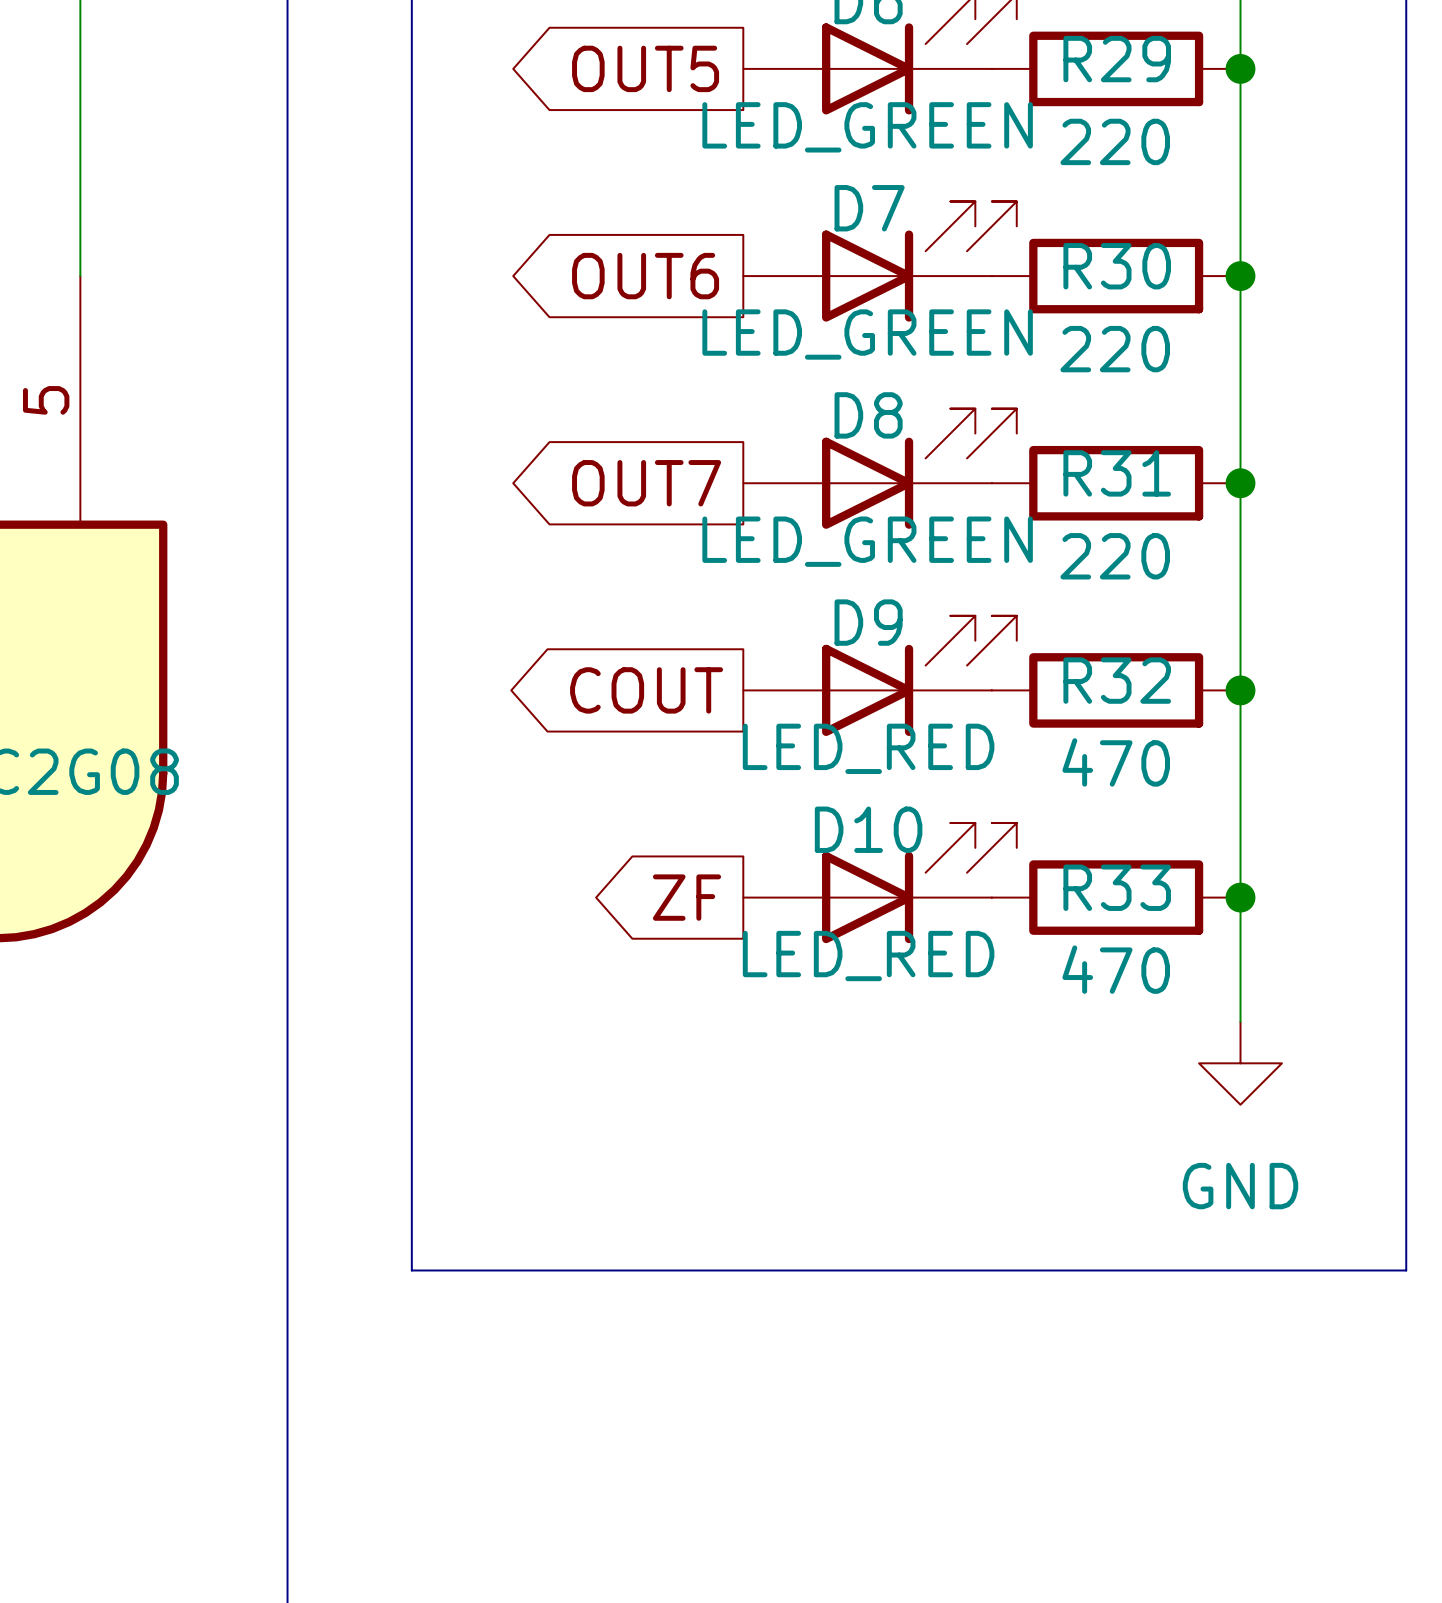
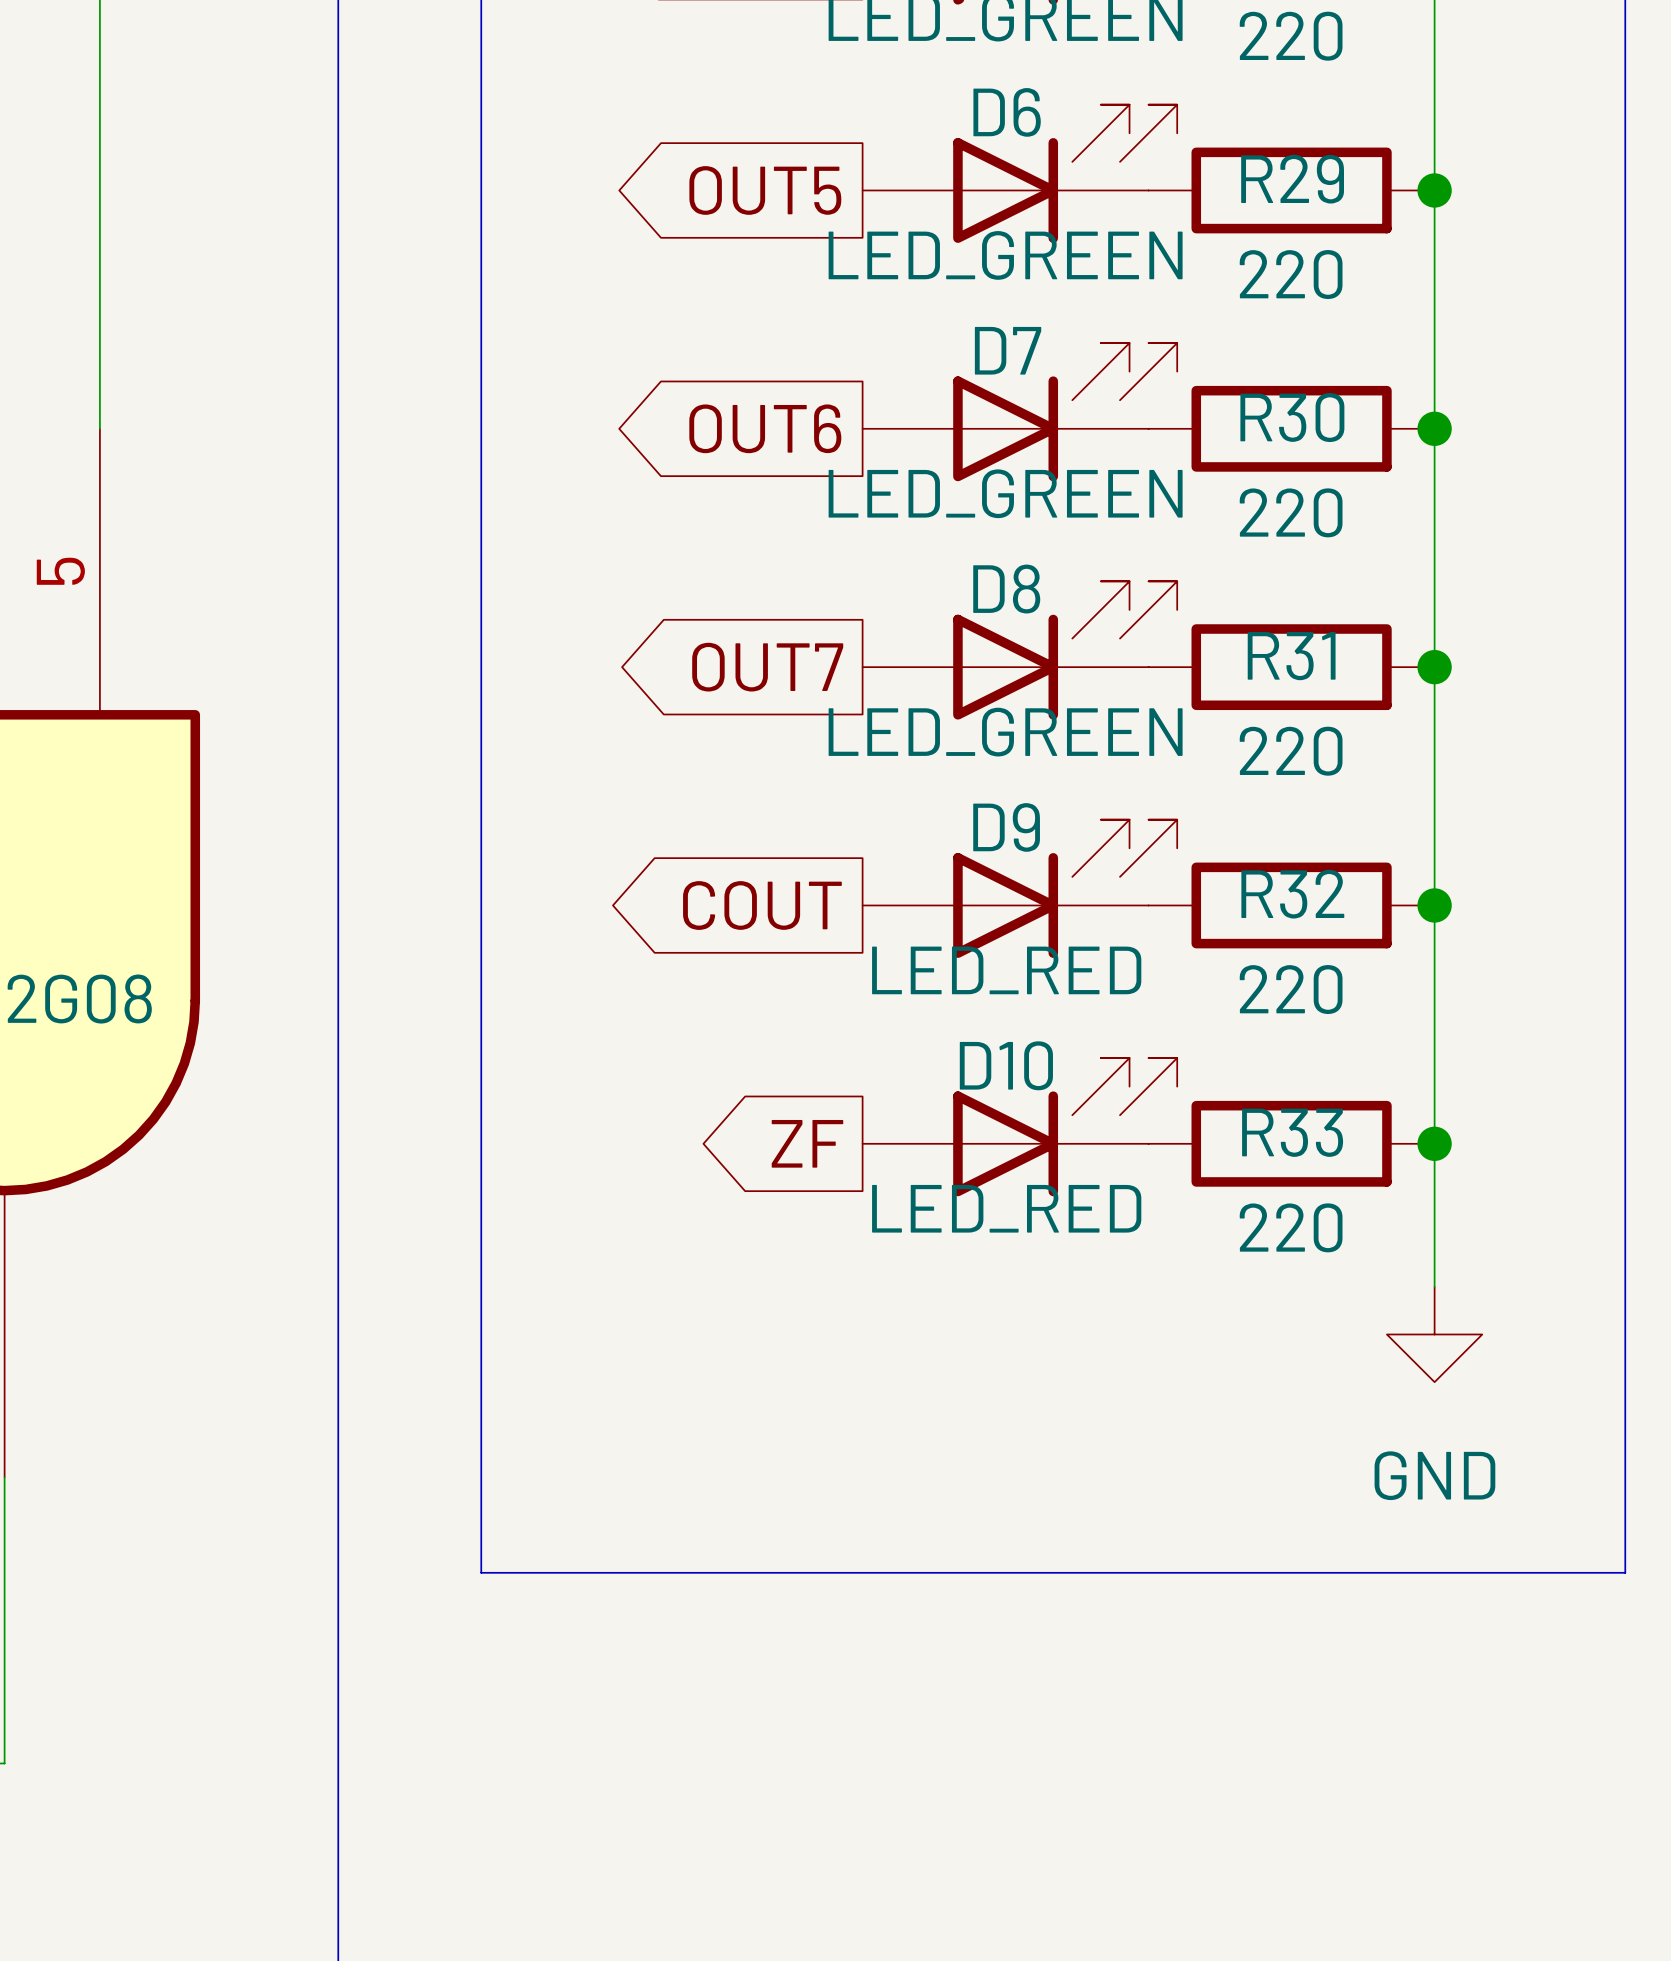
R32 value: 470 (1116, 762) -> 220 (1291, 989)
R33 value: 470 (1116, 969) -> 220 (1291, 1227)

